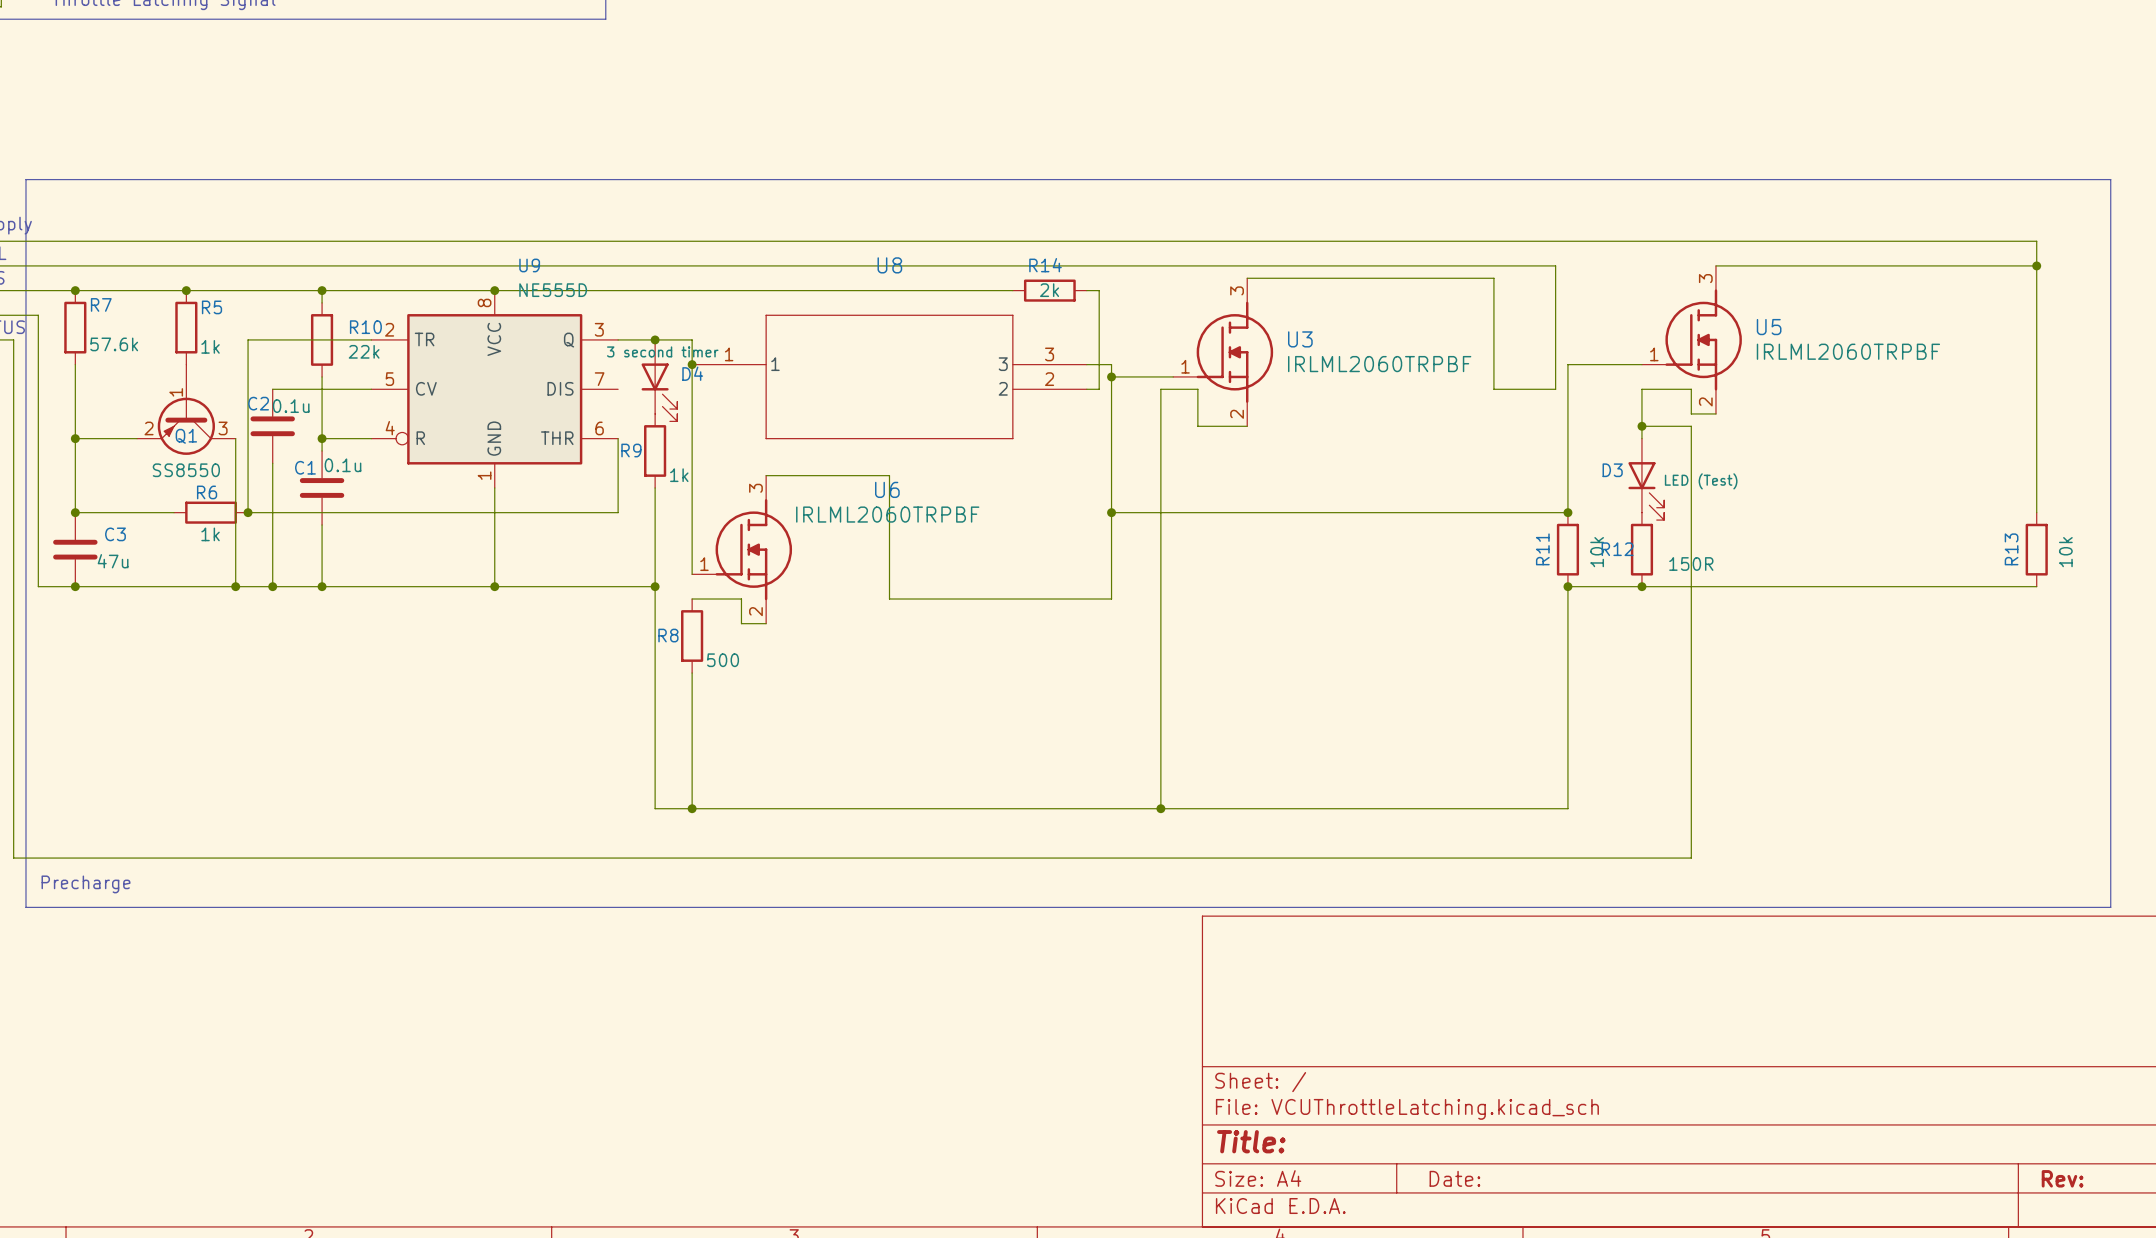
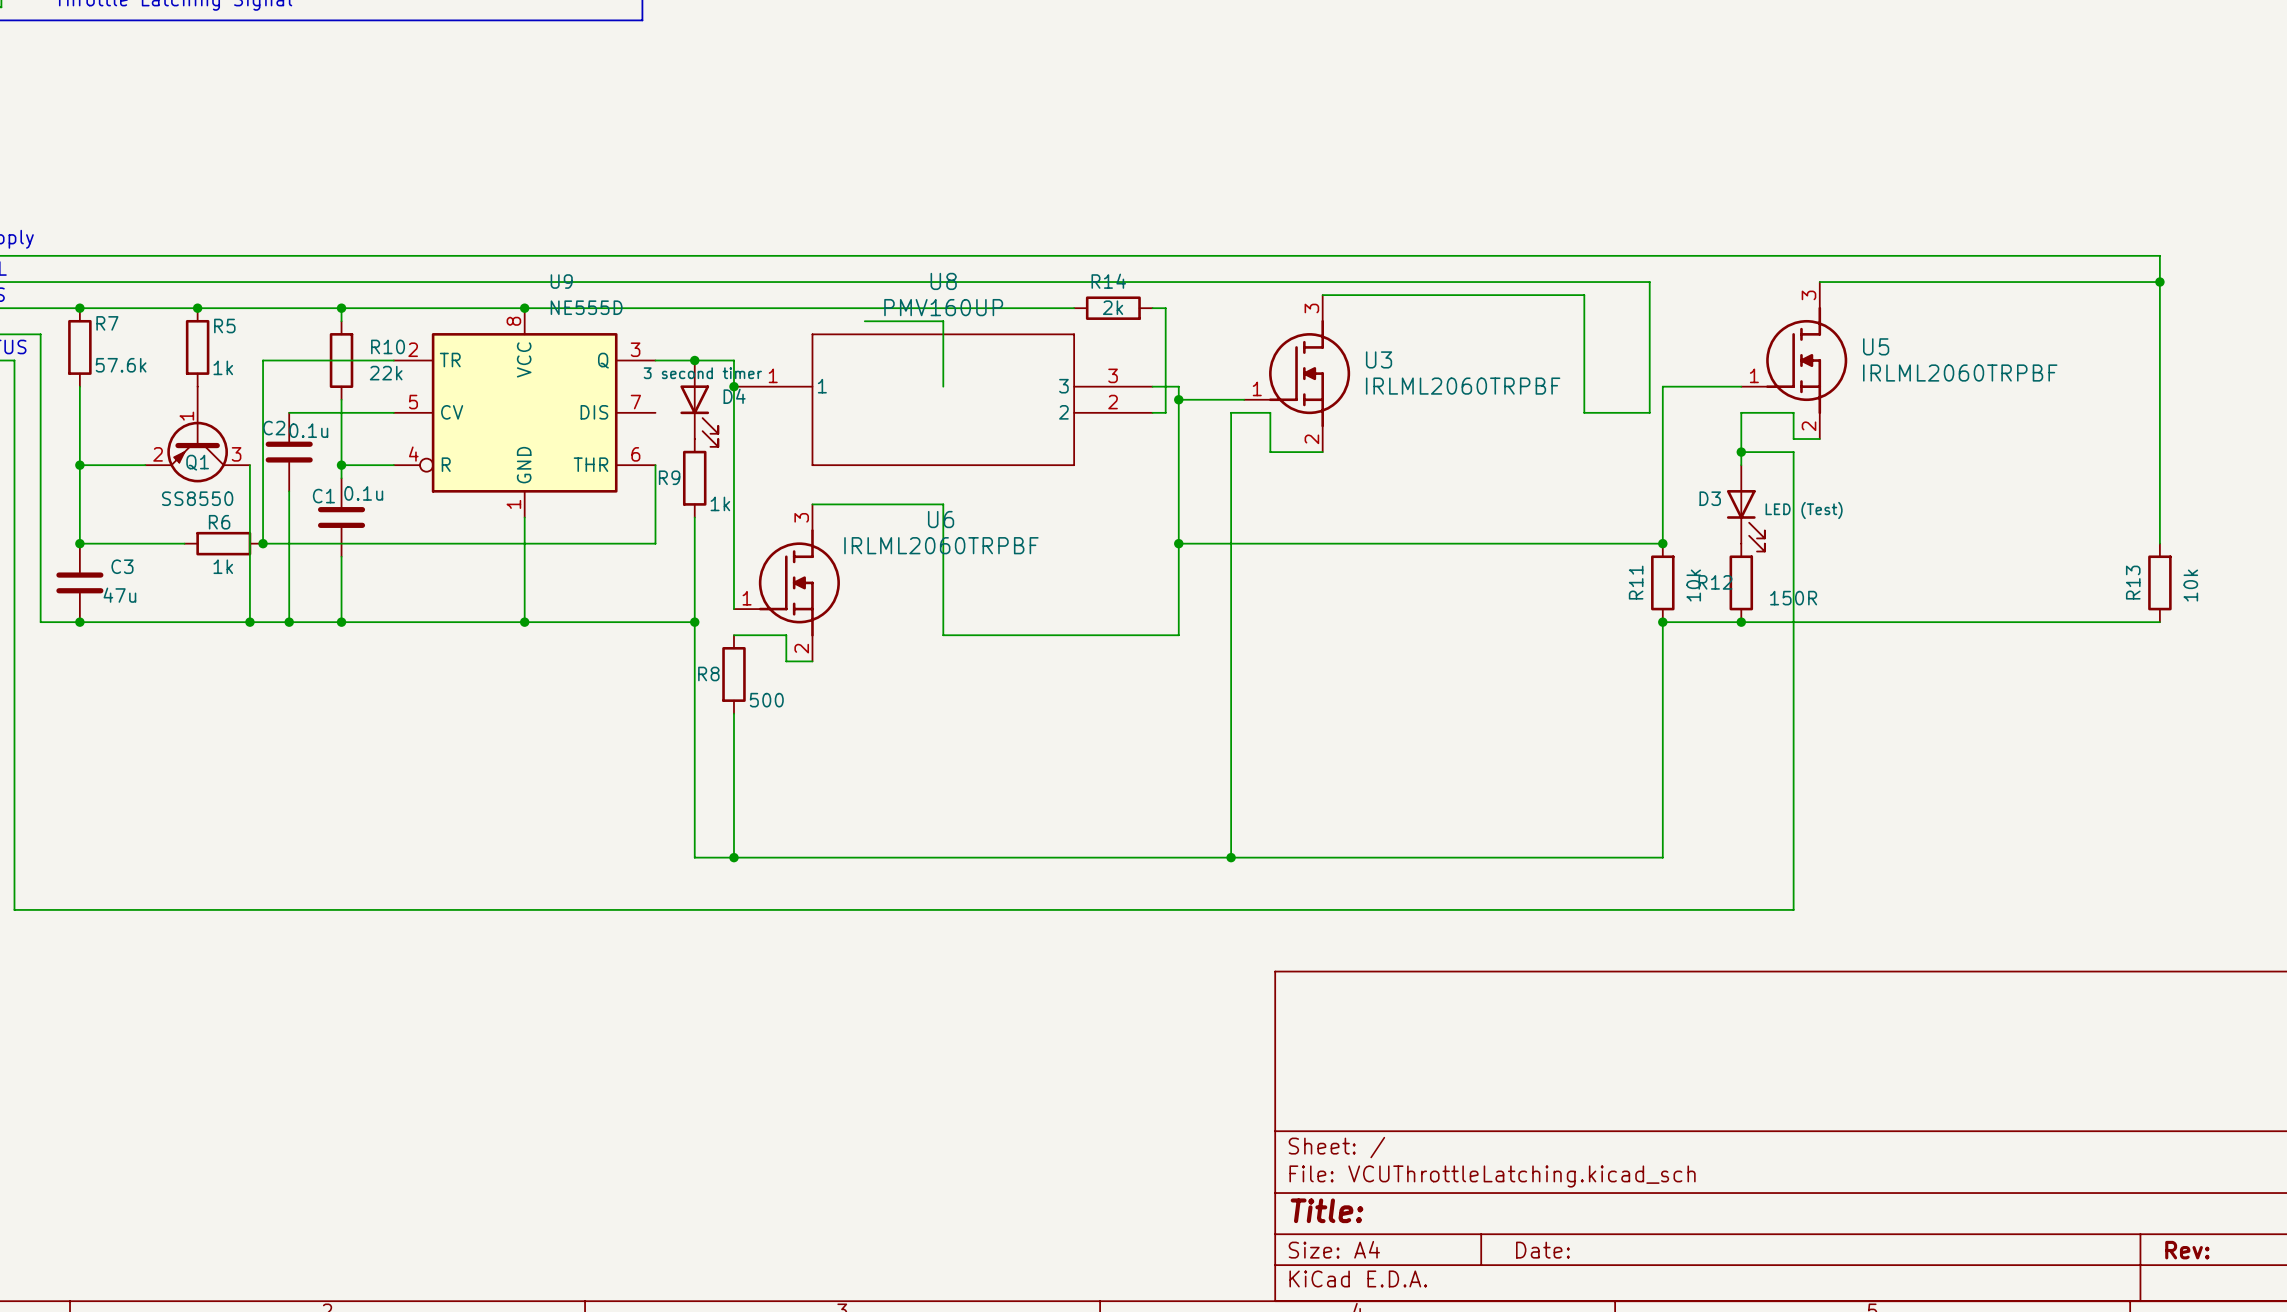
line: (25, 179) (2110, 179) (2110, 907) (25, 907) (25, 179) -> none
U8 value: none -> PMV160UP (943, 307)
wire: none -> (864, 321) (943, 321) (943, 386)
text: Precharge (86, 884) -> none

